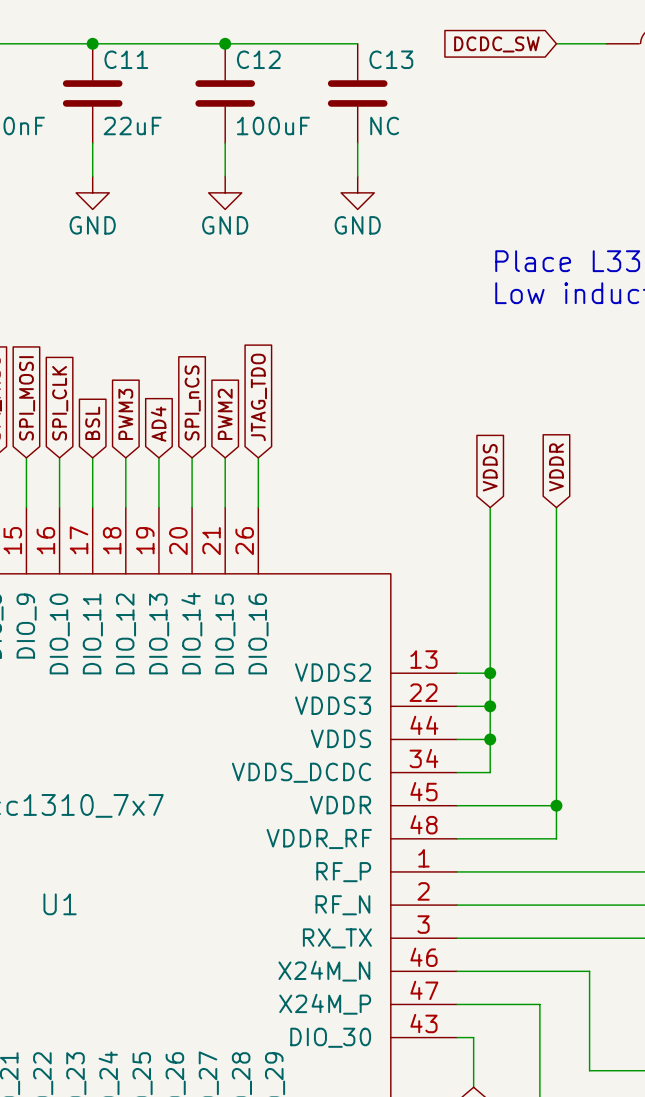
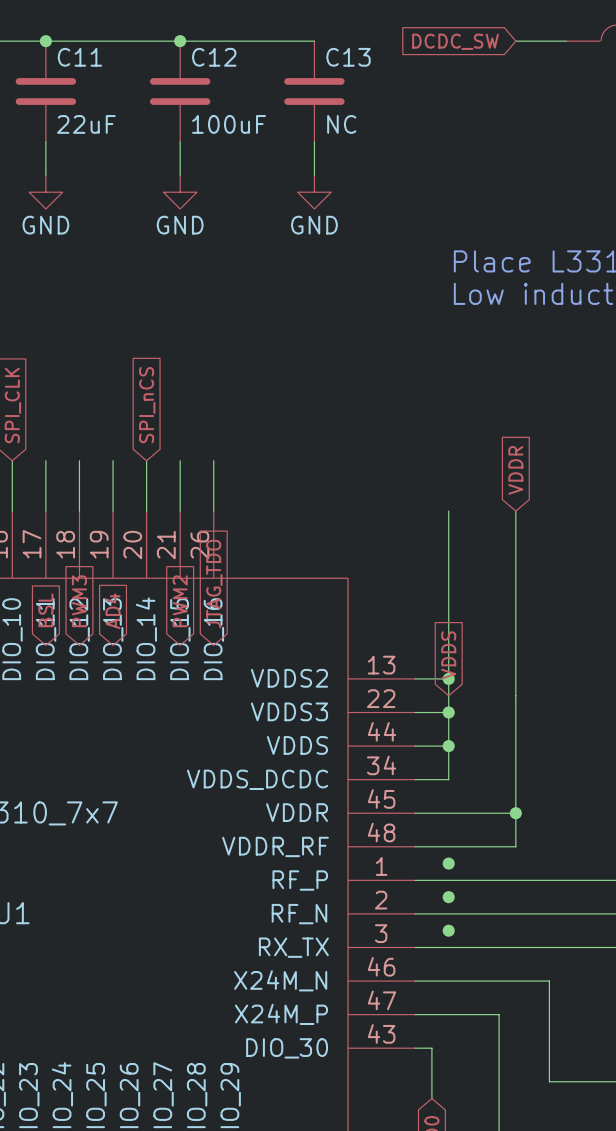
global label position: JTAG_TDO (258, 397) -> JTAG_TDO (214, 584)
global label position: PWM3 (125, 414) -> PWM3 (79, 601)
global label position: PWM2 (225, 414) -> PWM2 (180, 601)
global label position: BSL (92, 423) -> BSL (45, 610)
global label position: AD4 (158, 424) -> AD4 (112, 611)
global label position: VDDS (490, 467) -> VDDS (448, 655)
junction: none -> (448, 863)
junction: none -> (448, 897)
junction: none -> (448, 930)

